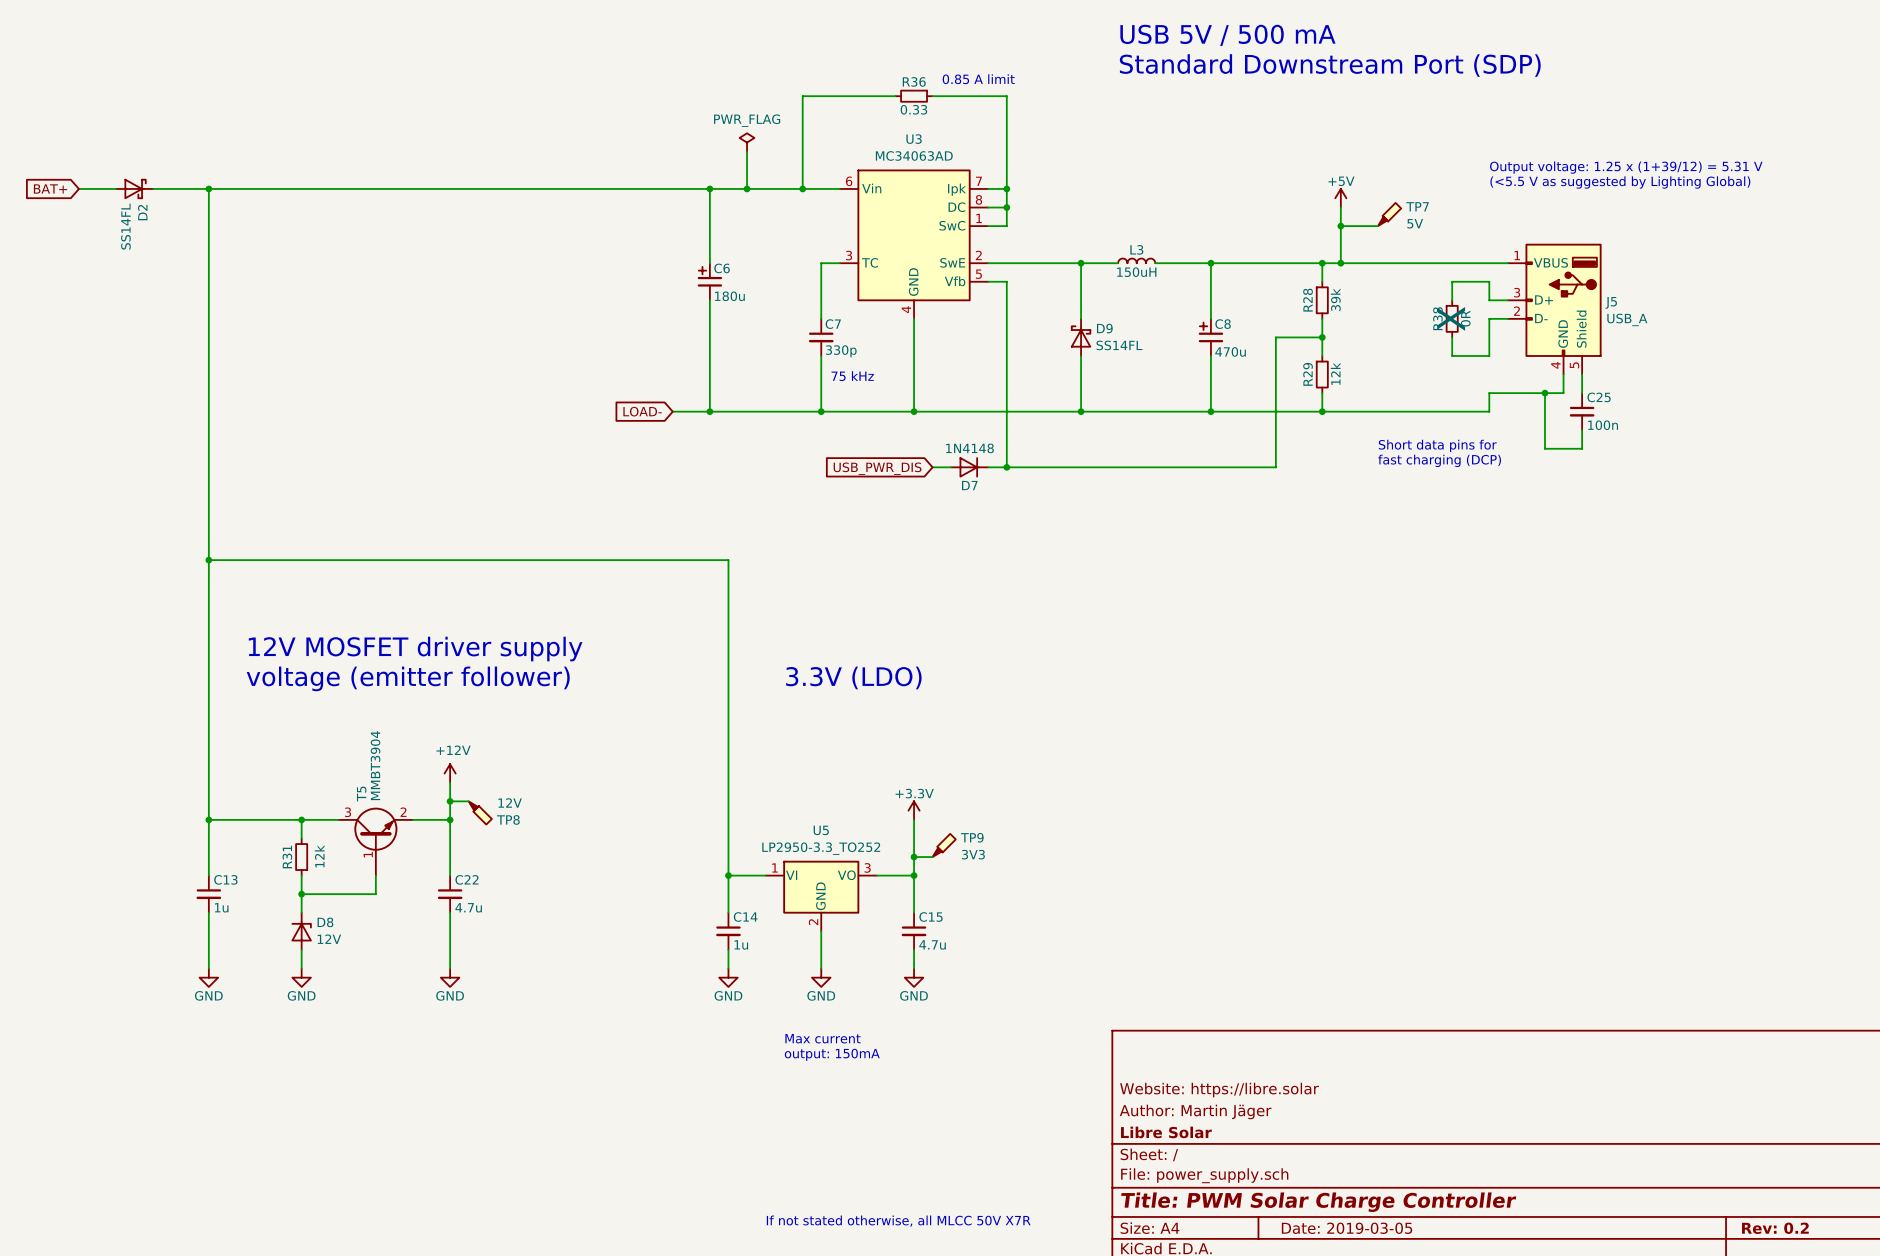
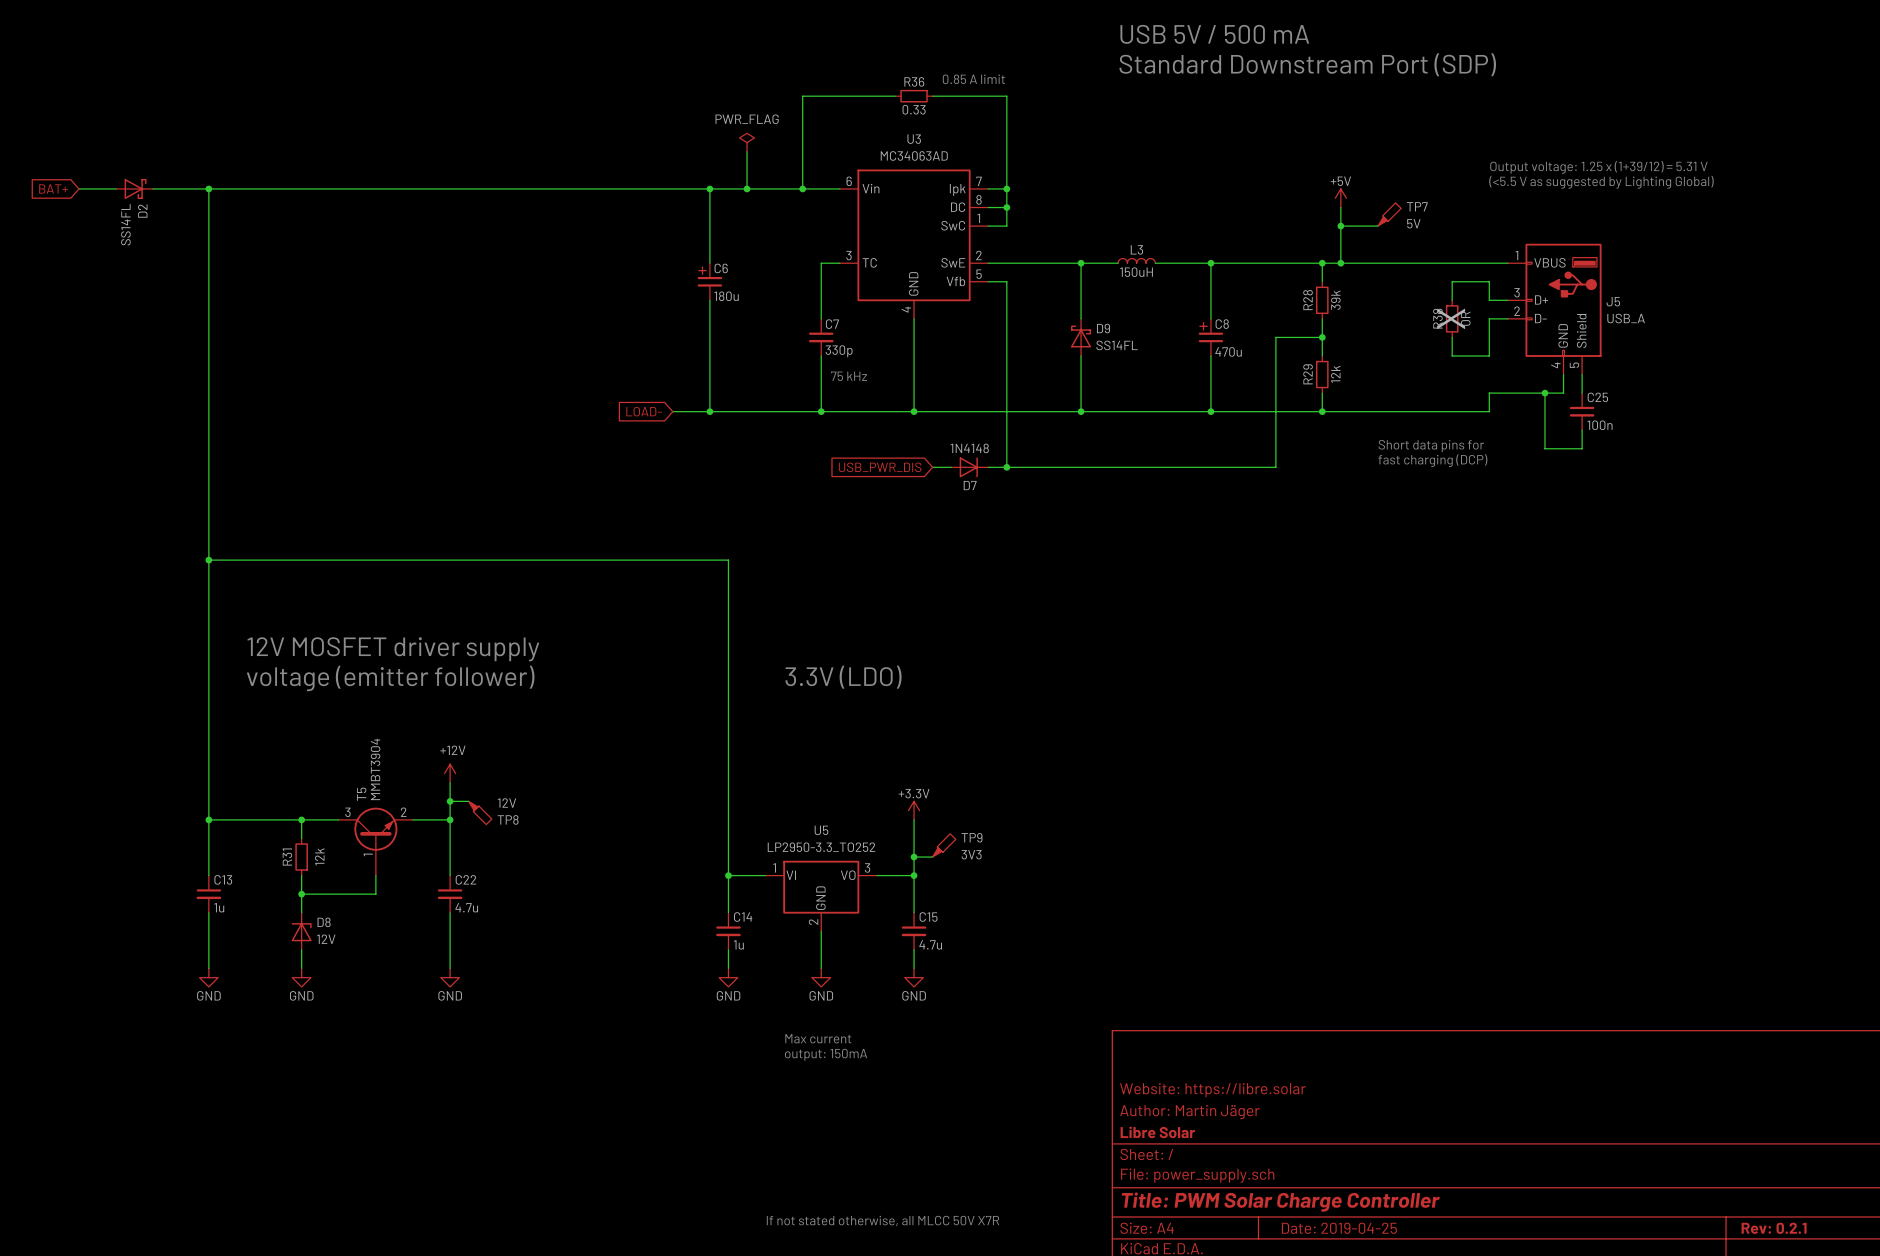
title block: Date: 2019-03-05 (1347, 1228) -> Date: 2019-04-25 (1339, 1228)
title block: Rev: 0.2 (1775, 1228) -> Rev: 0.2.1 (1774, 1228)

